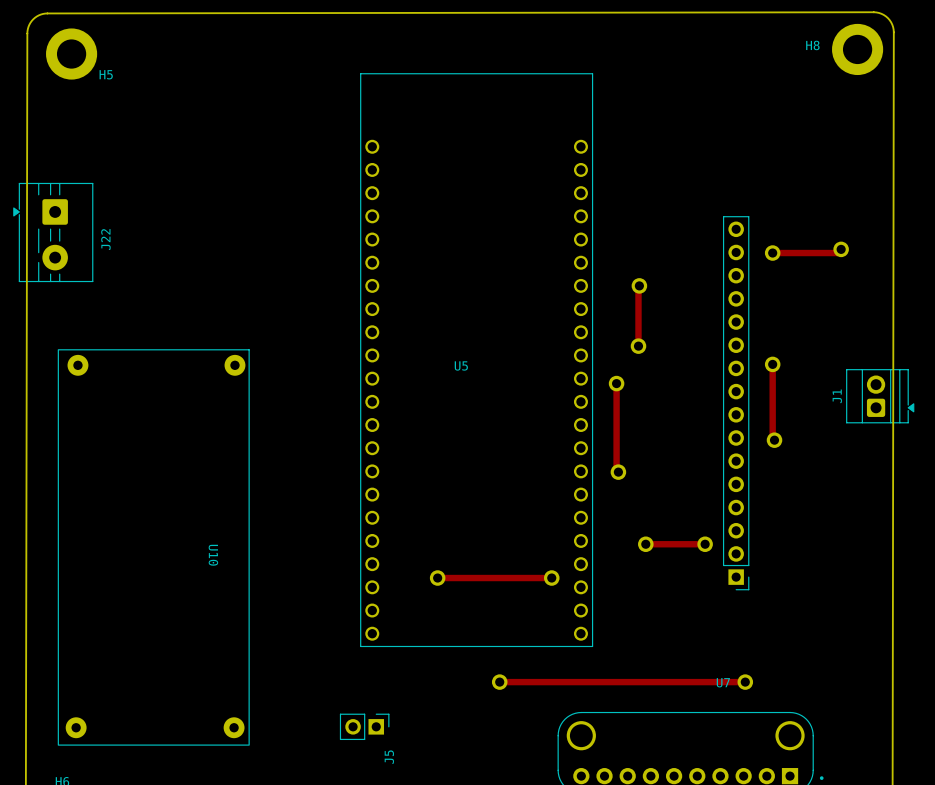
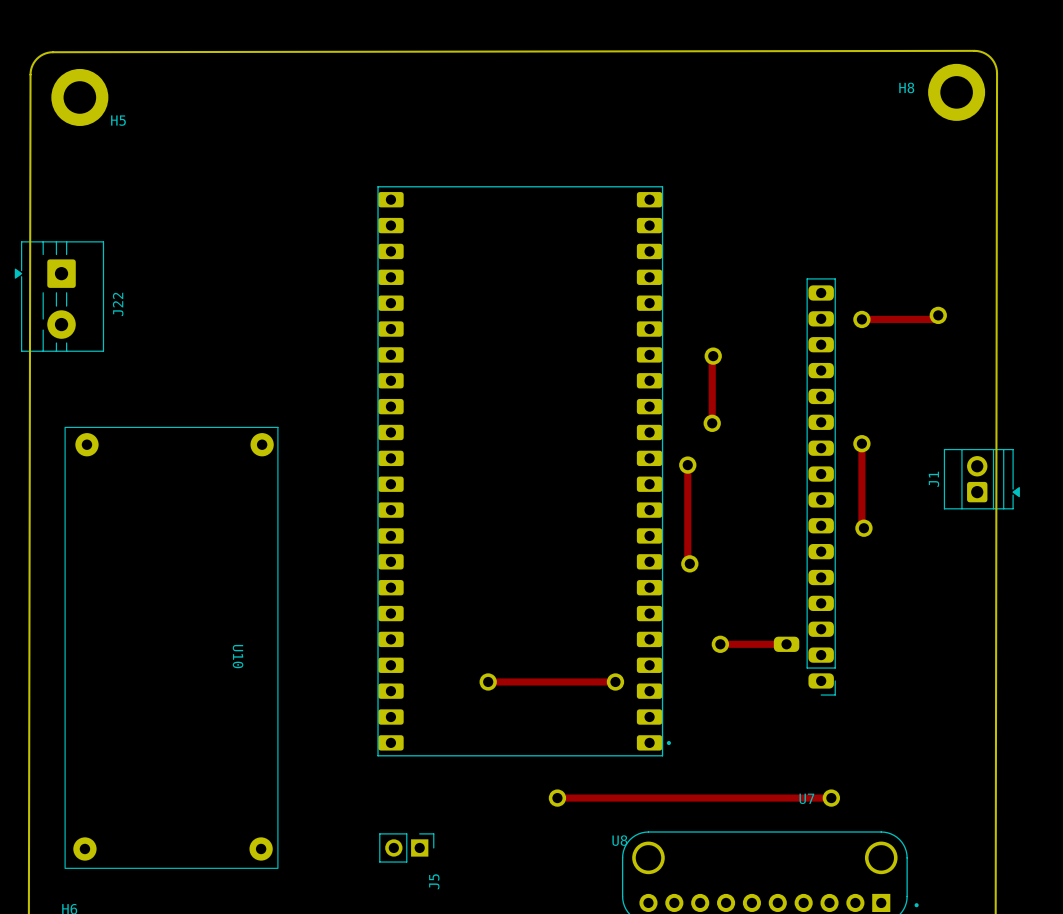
part footprint: [723, 216, 750, 591] -> [806, 278, 836, 696]
U5: (476, 360) -> none
U8: none -> (524, 471)
part footprint: [697, 536, 713, 553] -> [773, 636, 800, 652]

